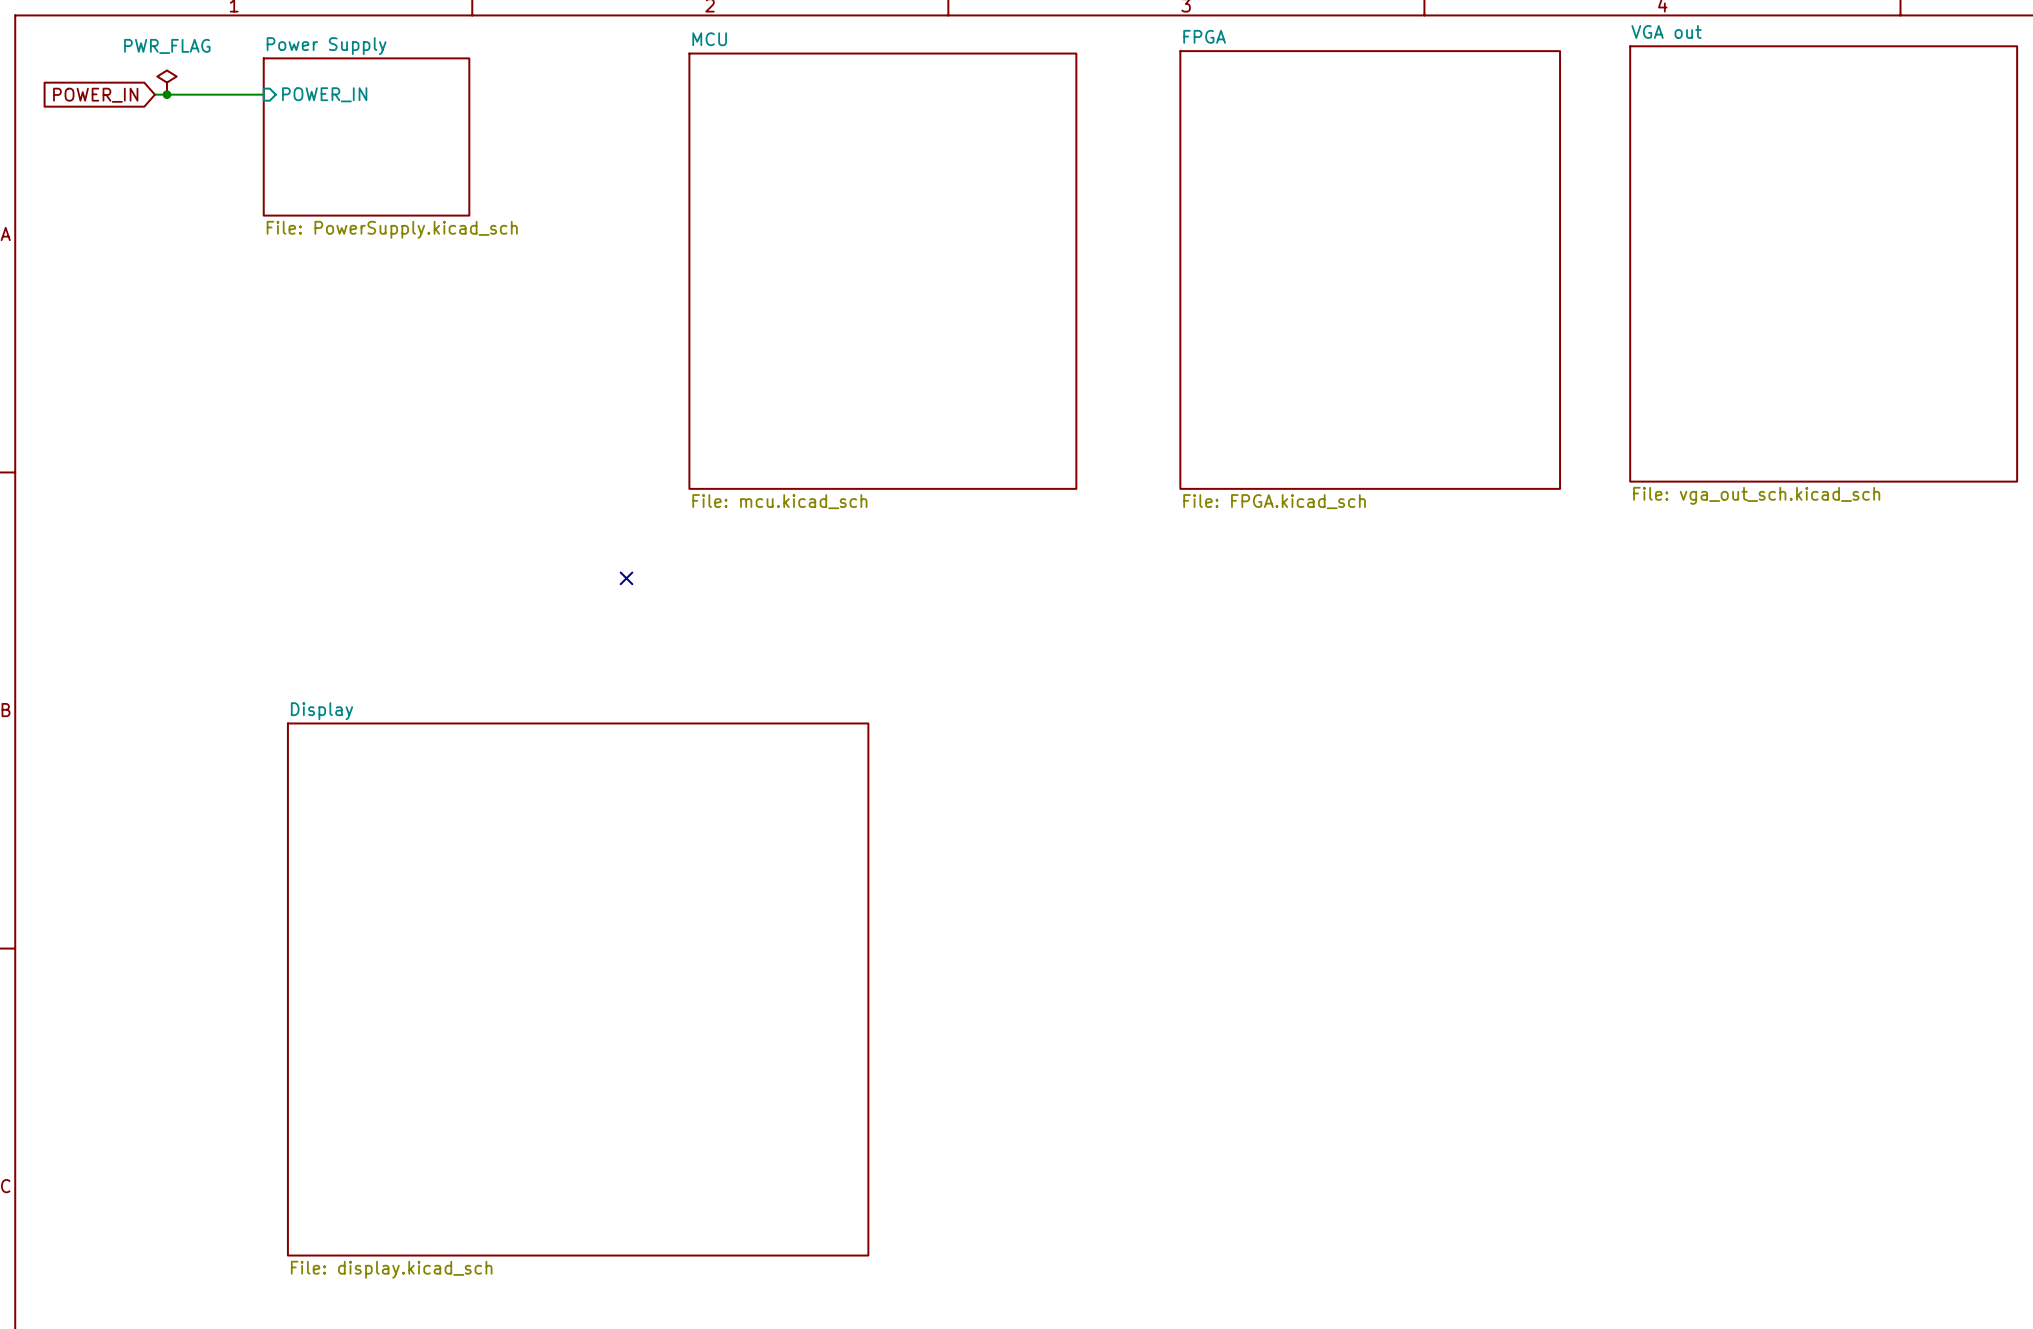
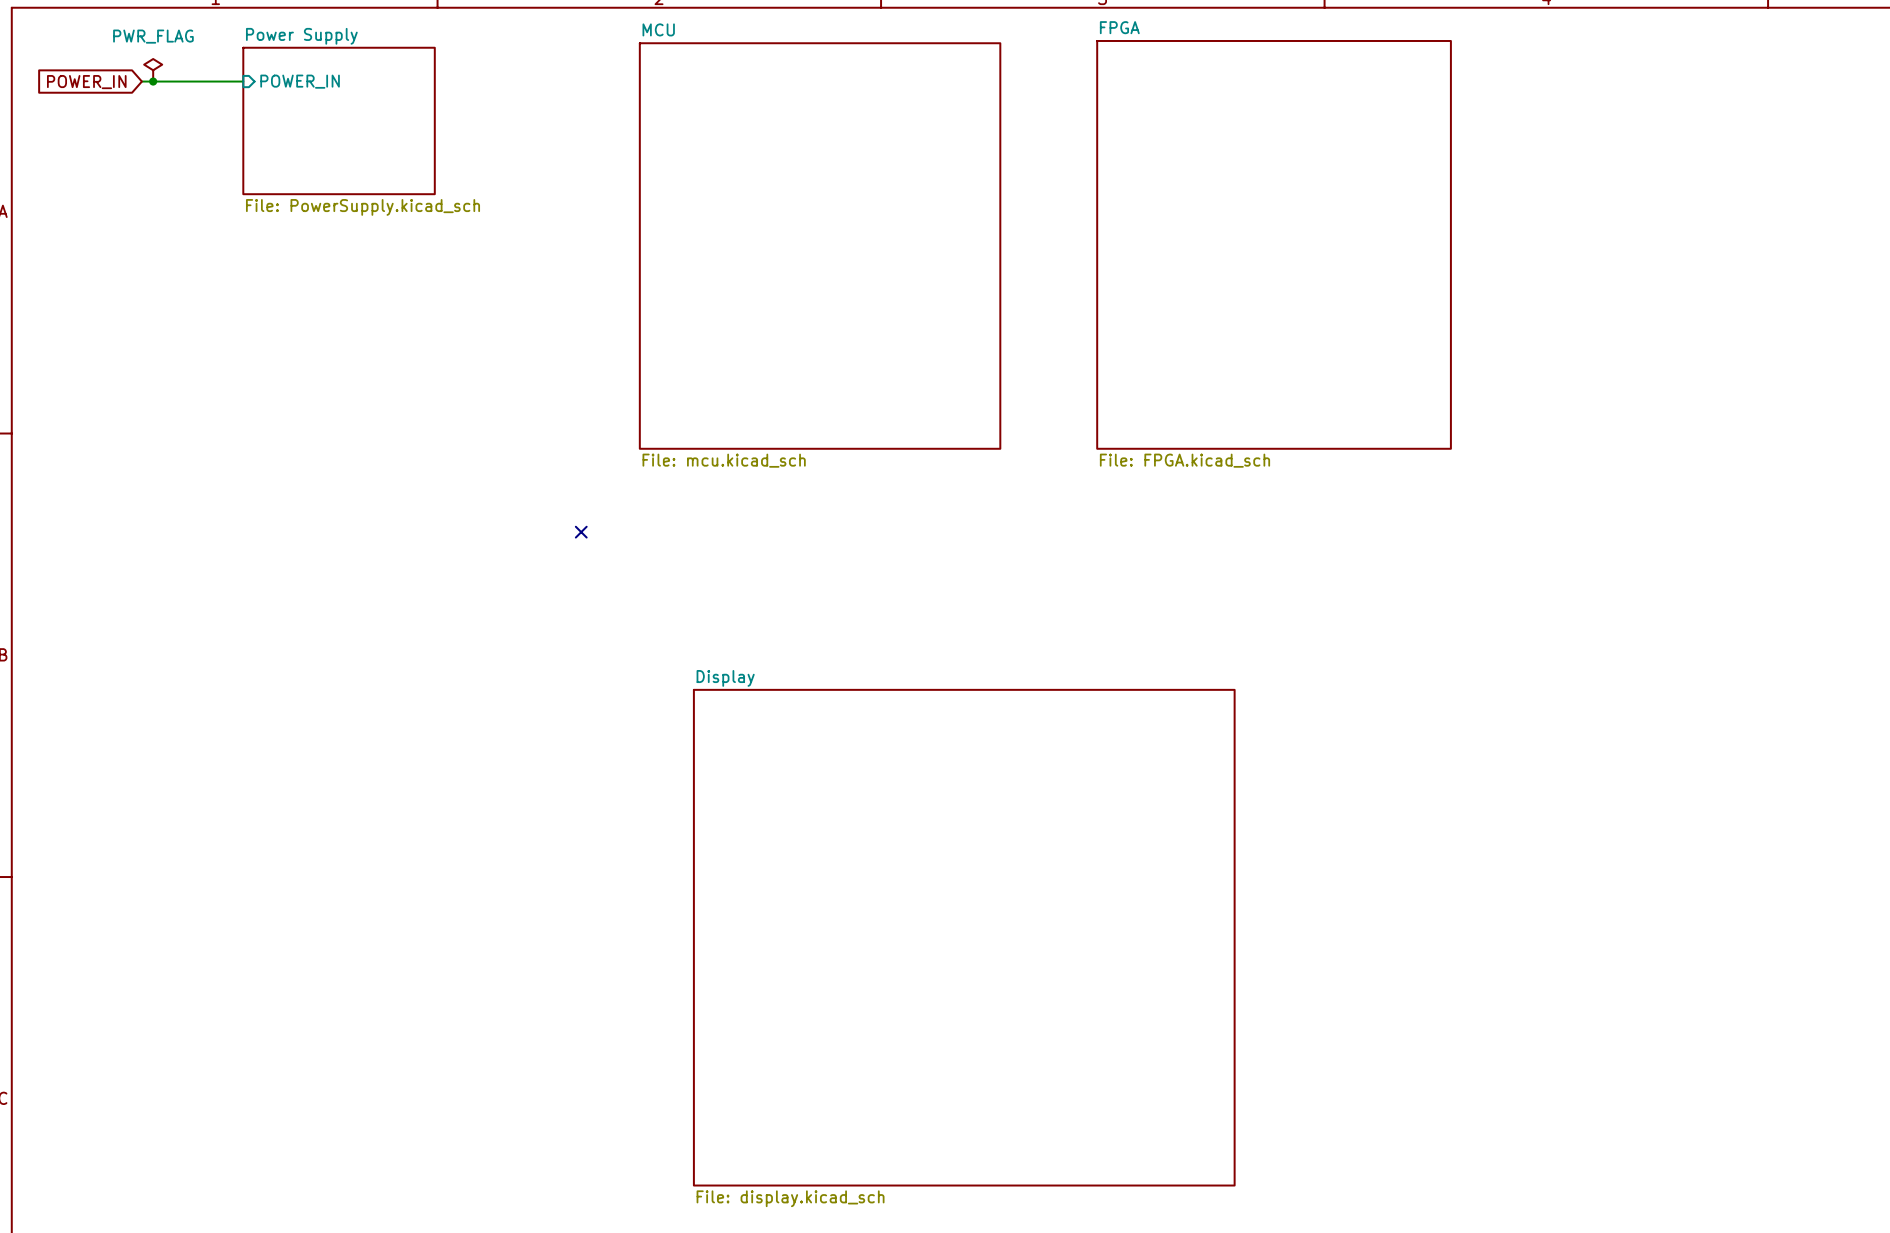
sheet VGA out: File: vga_out_sch.kicad_sch (1823, 263) -> none
sheet Display: File: display.kicad_sch (578, 989) -> none
sheet Display: none -> File: display.kicad_sch (964, 937)

